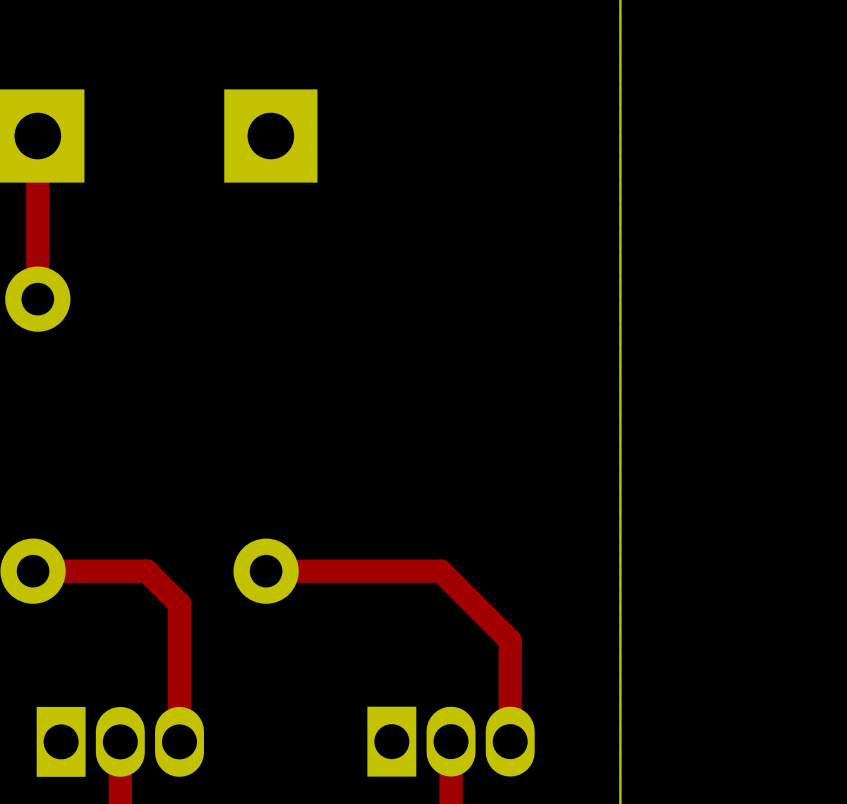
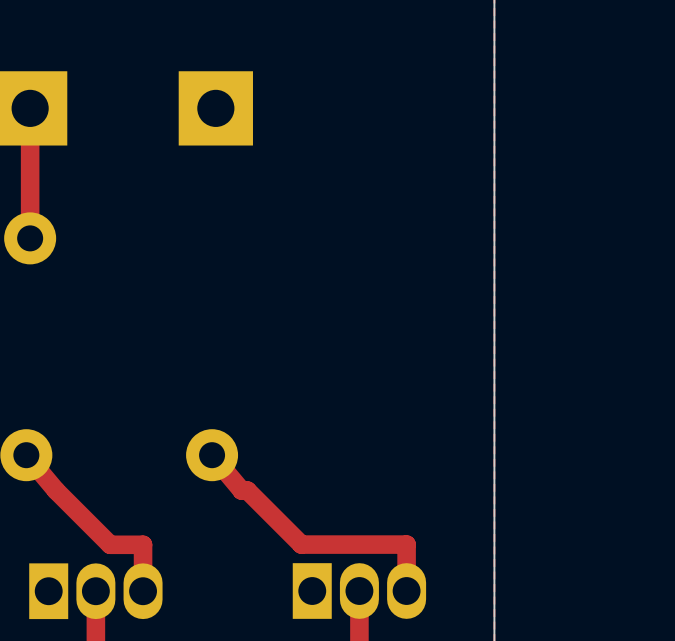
top track: (33, 571) (146, 571) (179, 603) (179, 683) -> (26, 455) (56, 490) (110, 544) (143, 544)
top track: (266, 571) (440, 571) (510, 640) (510, 683) -> (212, 455) (241, 490) (247, 490) (301, 544) (406, 544)

